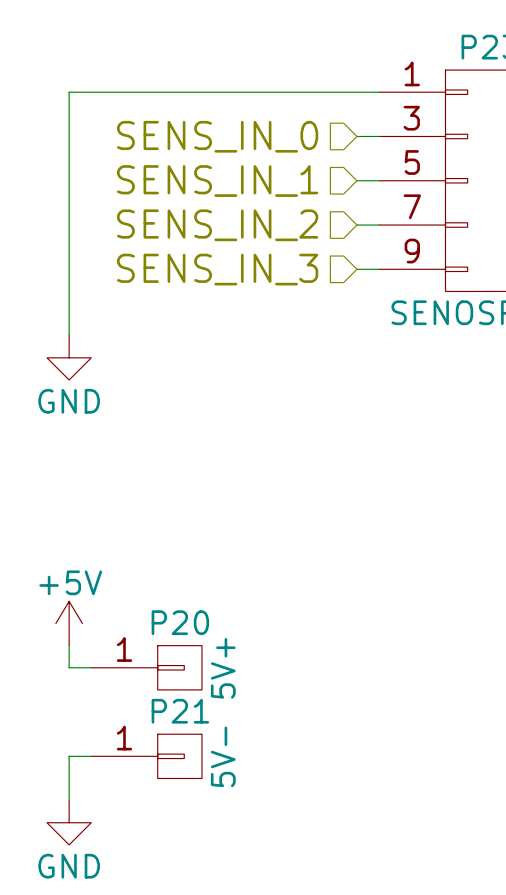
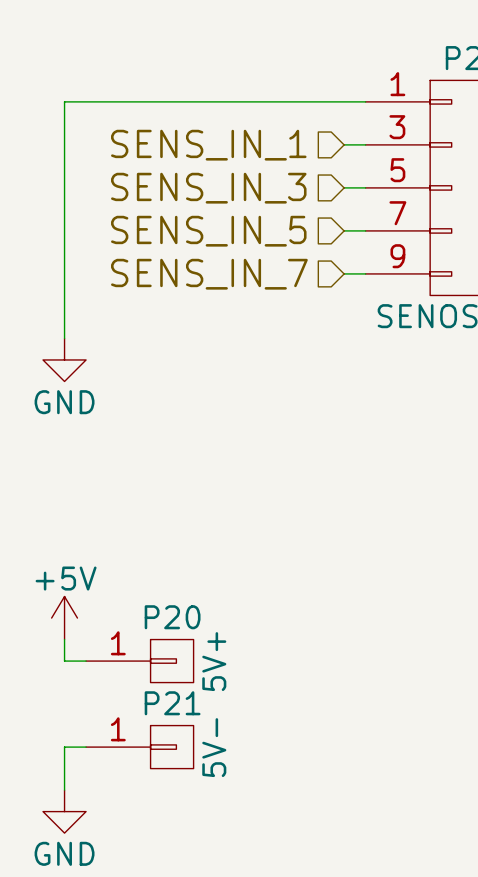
hierarchical label: SENS_IN_0 (217, 136) -> SENS_IN_1 (208, 145)
hierarchical label: SENS_IN_1 (217, 181) -> SENS_IN_3 (208, 188)
hierarchical label: SENS_IN_2 (217, 225) -> SENS_IN_5 (208, 231)
hierarchical label: SENS_IN_3 (217, 269) -> SENS_IN_7 (209, 274)

